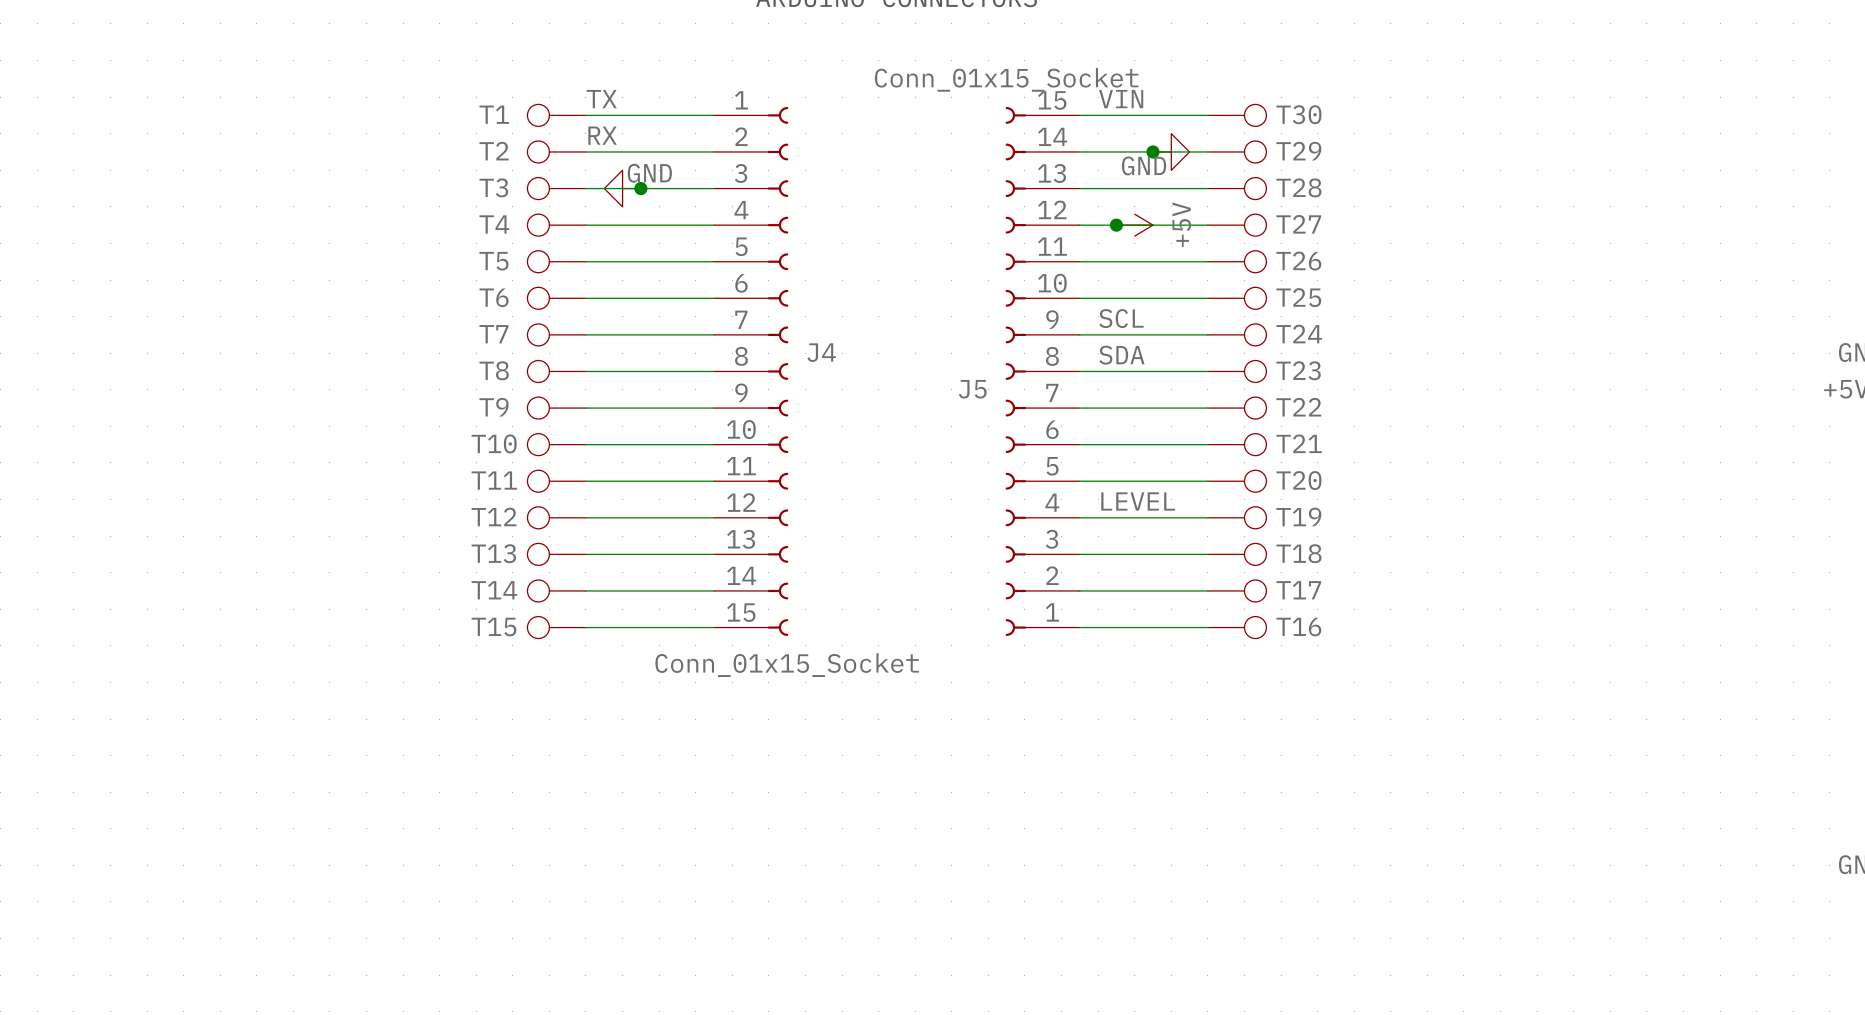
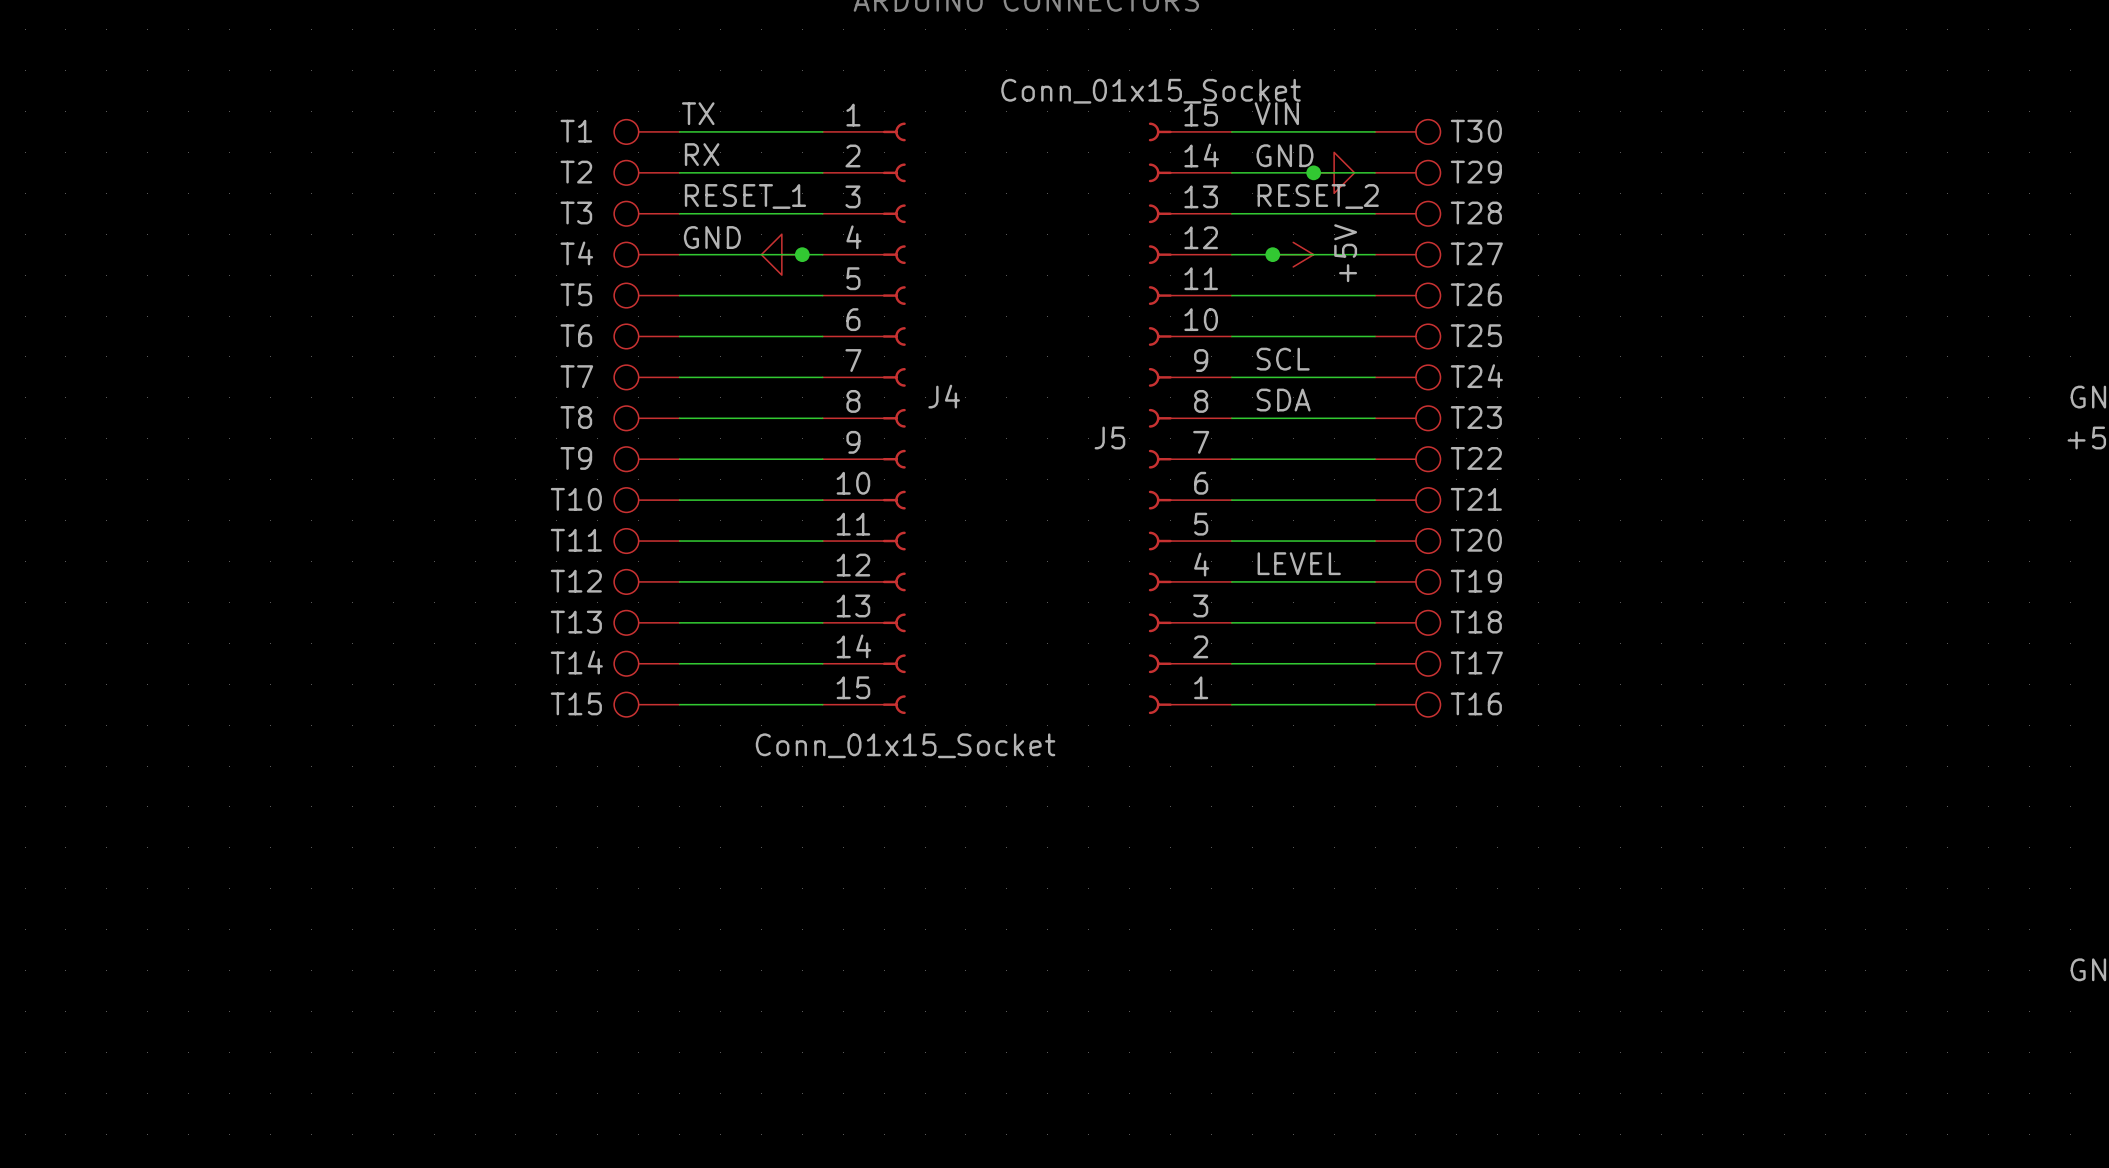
power symbol text position: GND (1144, 165) -> GND (1284, 155)
power symbol text position: GND (649, 173) -> GND (712, 237)
label: none -> RESET_1 (745, 196)
label: none -> RESET_2 (1318, 196)
power symbol position: GND (622, 188) -> GND (781, 254)
junction position: (640, 188) -> (802, 254)

